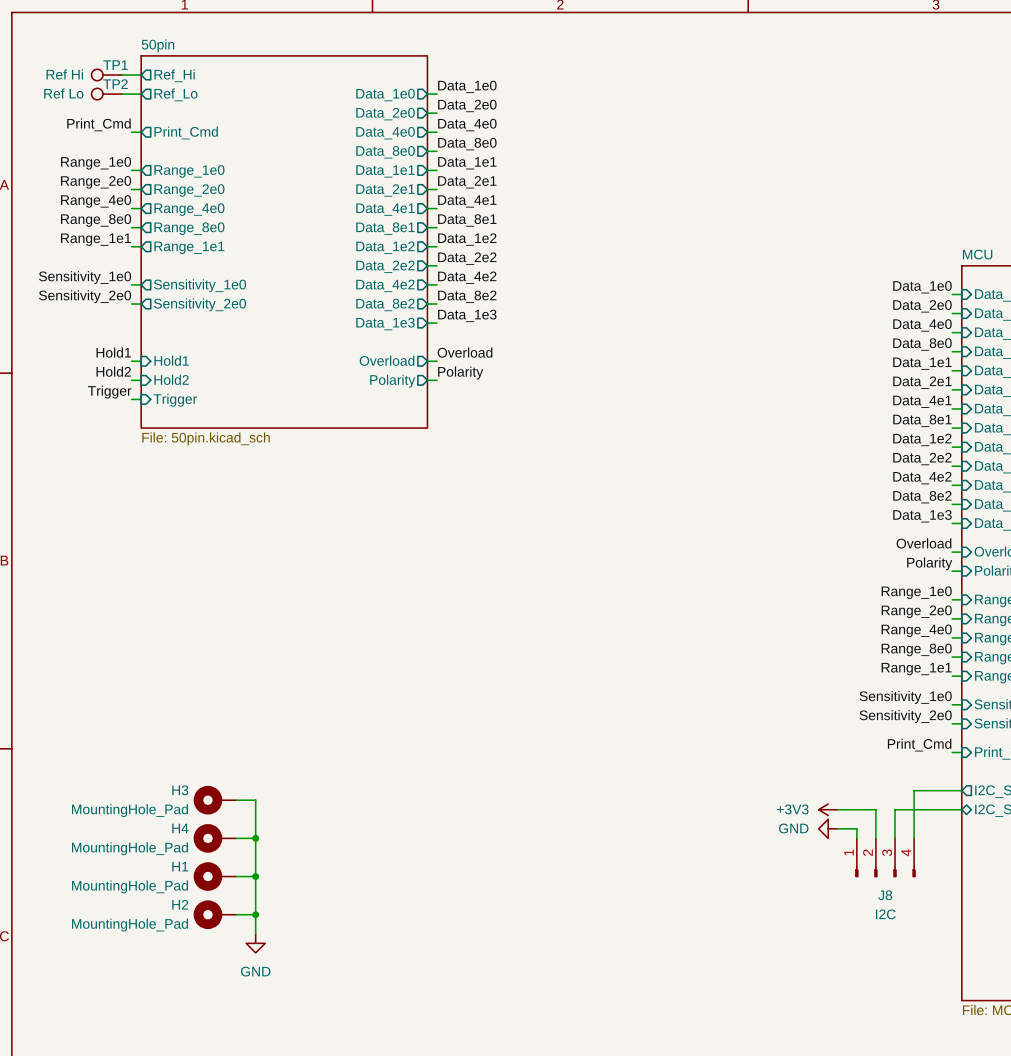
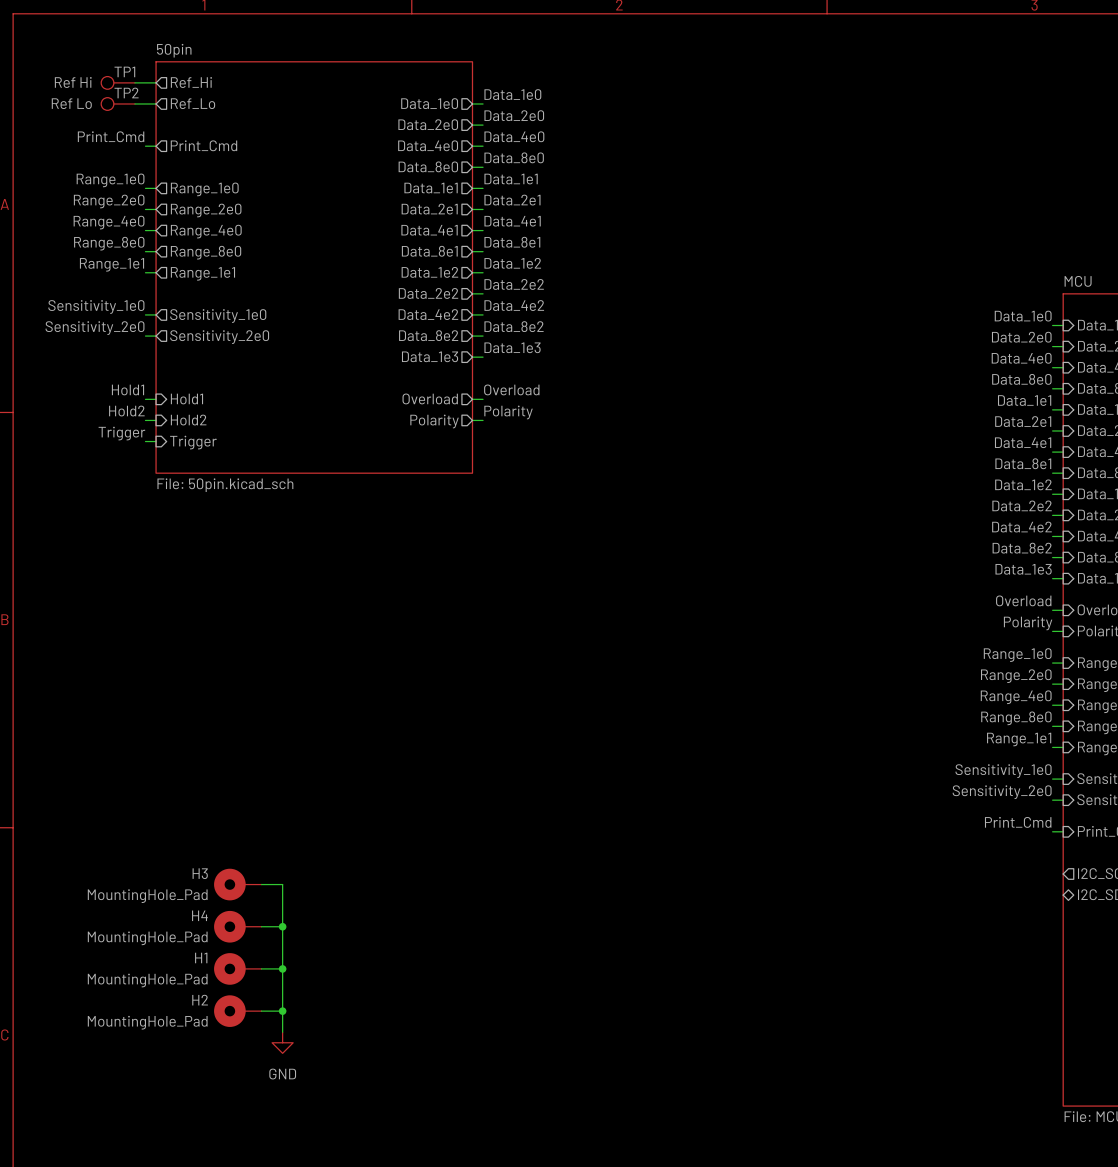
wire: (961, 790) (914, 790) (914, 838) -> none
power symbol: +3V3 (828, 809) -> none
wire: (837, 809) (875, 809) (875, 838) -> none
wire: (961, 809) (895, 809) (895, 838) -> none
power symbol: GND (828, 828) -> none
wire: (837, 828) (856, 828) (856, 838) -> none
J8: I2C (885, 857) -> none

